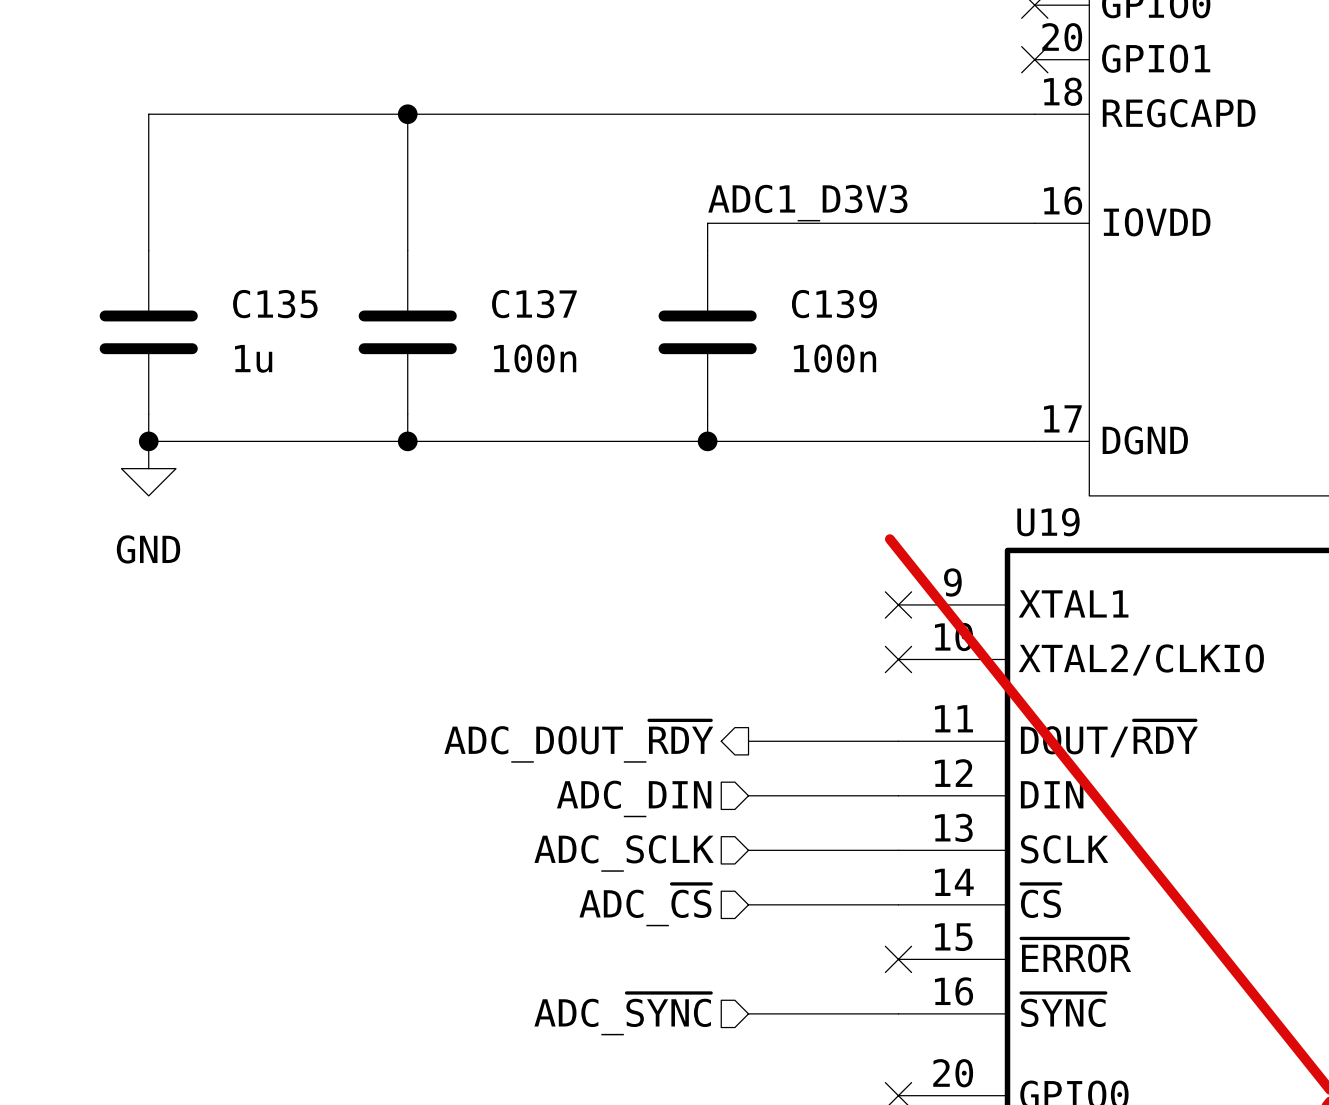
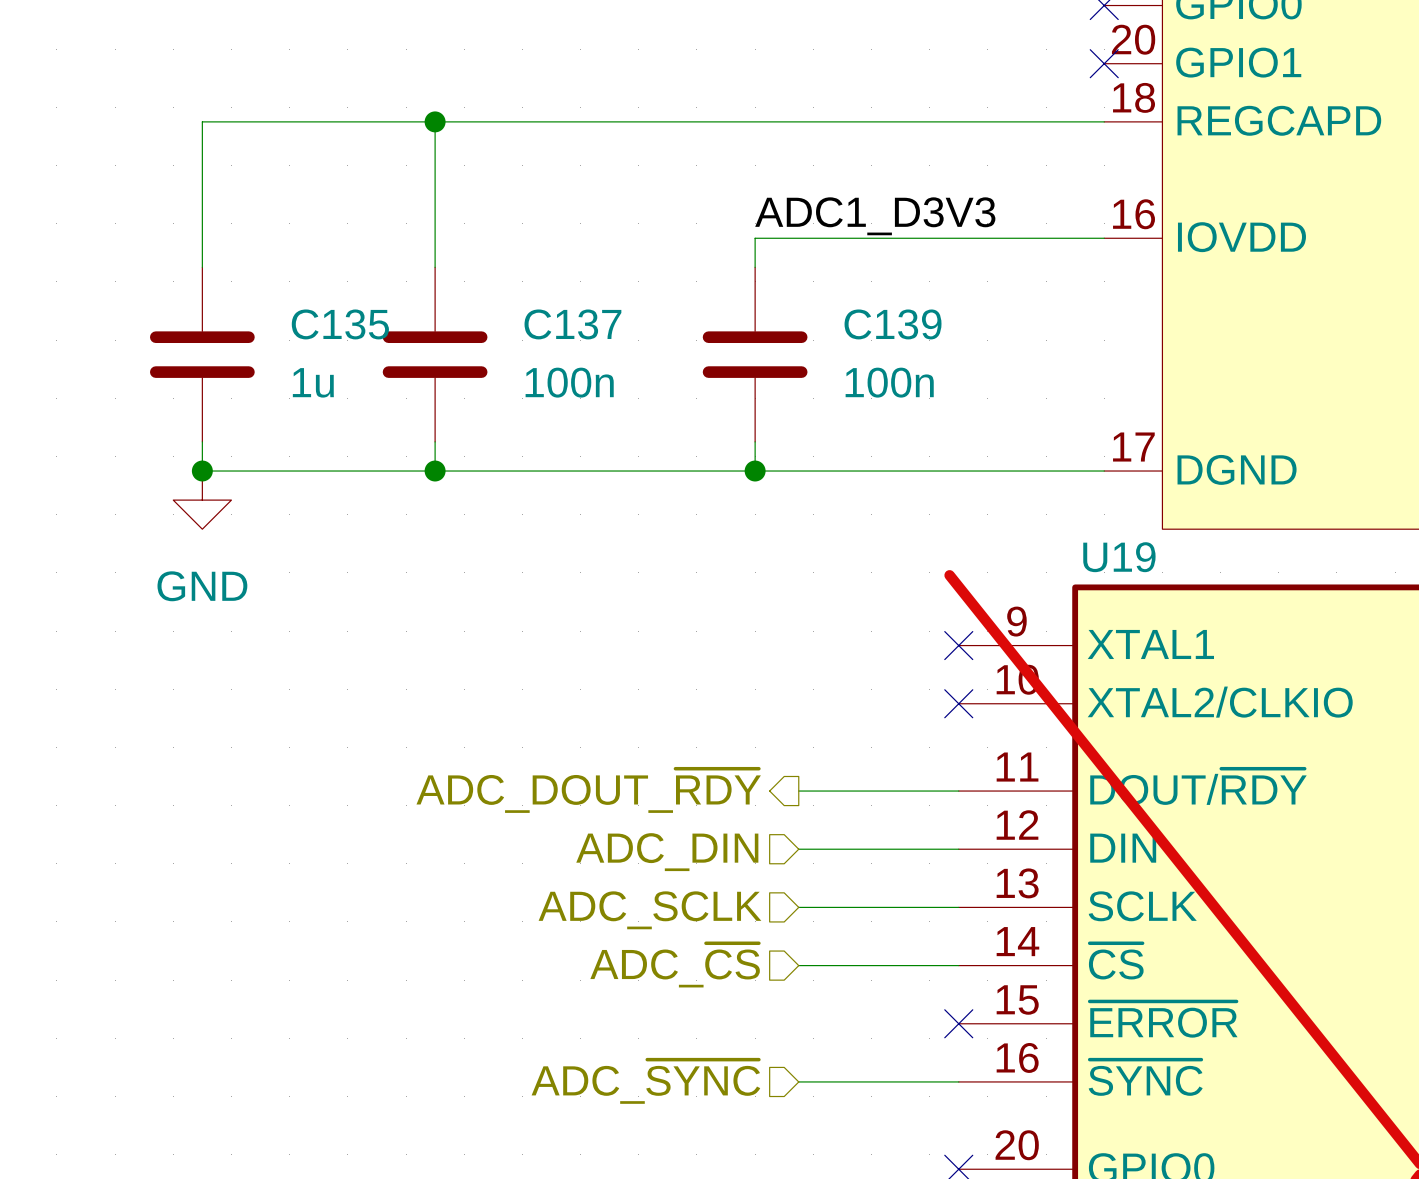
wire: (189, 114) (148, 114) (148, 250) -> (202, 121) (202, 267)
C135 position: (148, 332) -> (202, 354)
wire: (148, 414) (148, 441) (189, 441) -> (202, 441) (202, 471)
junction position: (148, 441) -> (202, 471)
power symbol position: GND (148, 468) -> GND (202, 500)

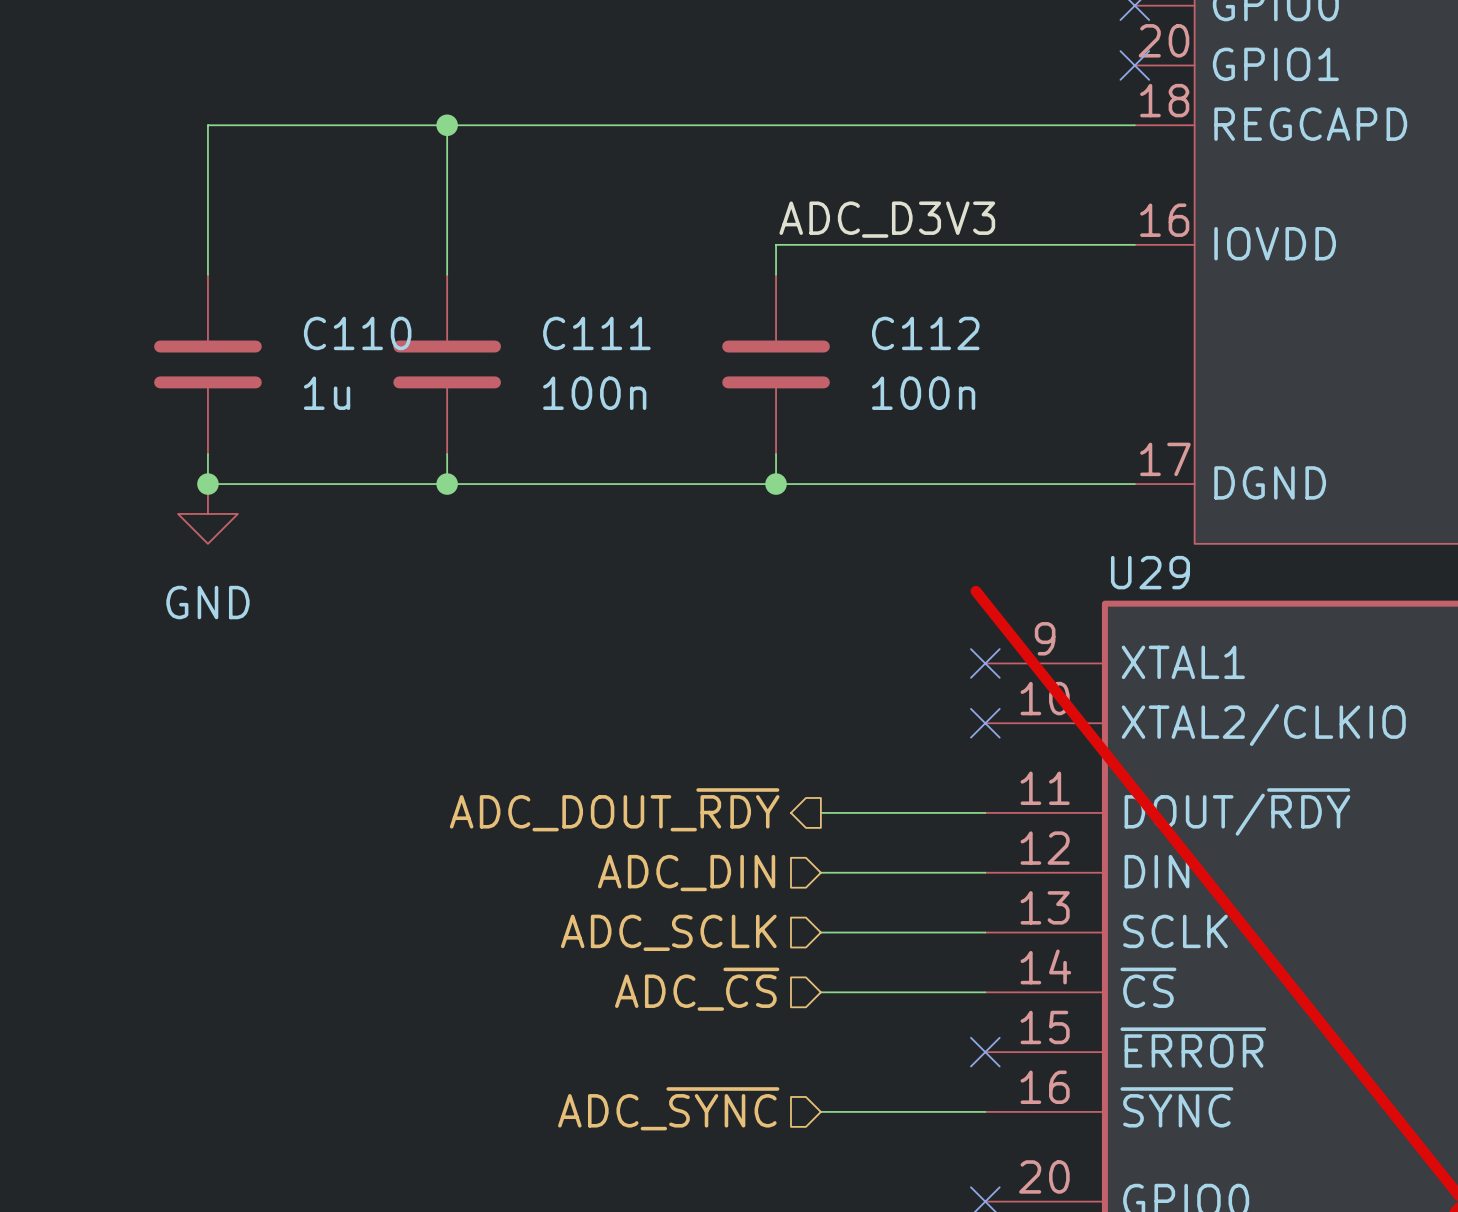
label: ADC1_D3V3 (875, 216) -> ADC_D3V3 (887, 219)
C135 name: C135 (340, 324) -> C110 (357, 333)
C137 name: C137 (572, 324) -> C111 (596, 333)
C139 name: C139 (893, 324) -> C112 (925, 333)
U19 name: U19 (1119, 557) -> U29 (1150, 572)

